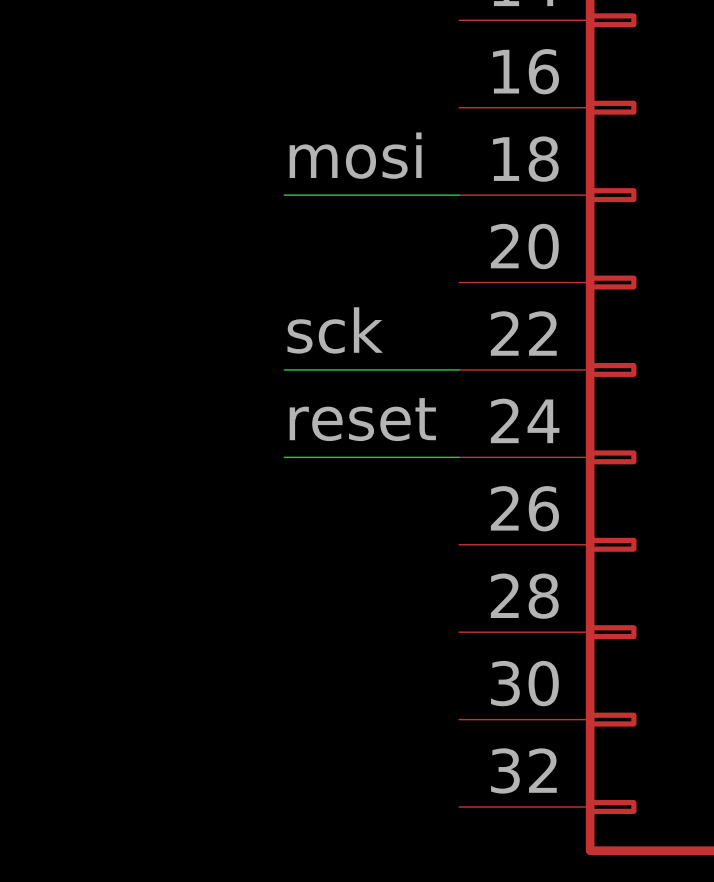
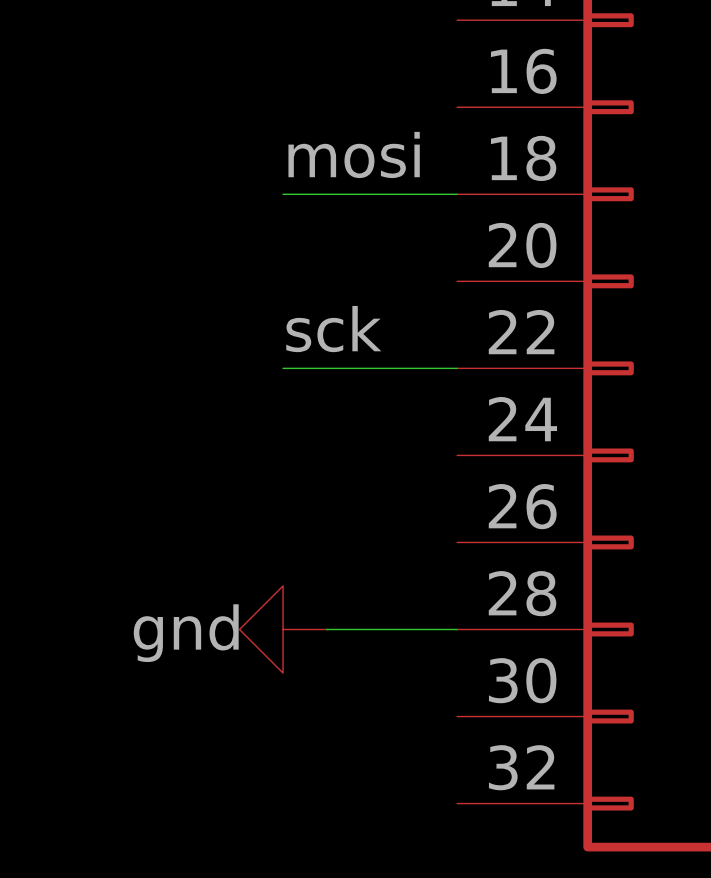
label: reset (362, 419) -> none
wire: (284, 457) (459, 457) -> none
power symbol: none -> gnd (283, 629)
wire: none -> (326, 629) (457, 629)

